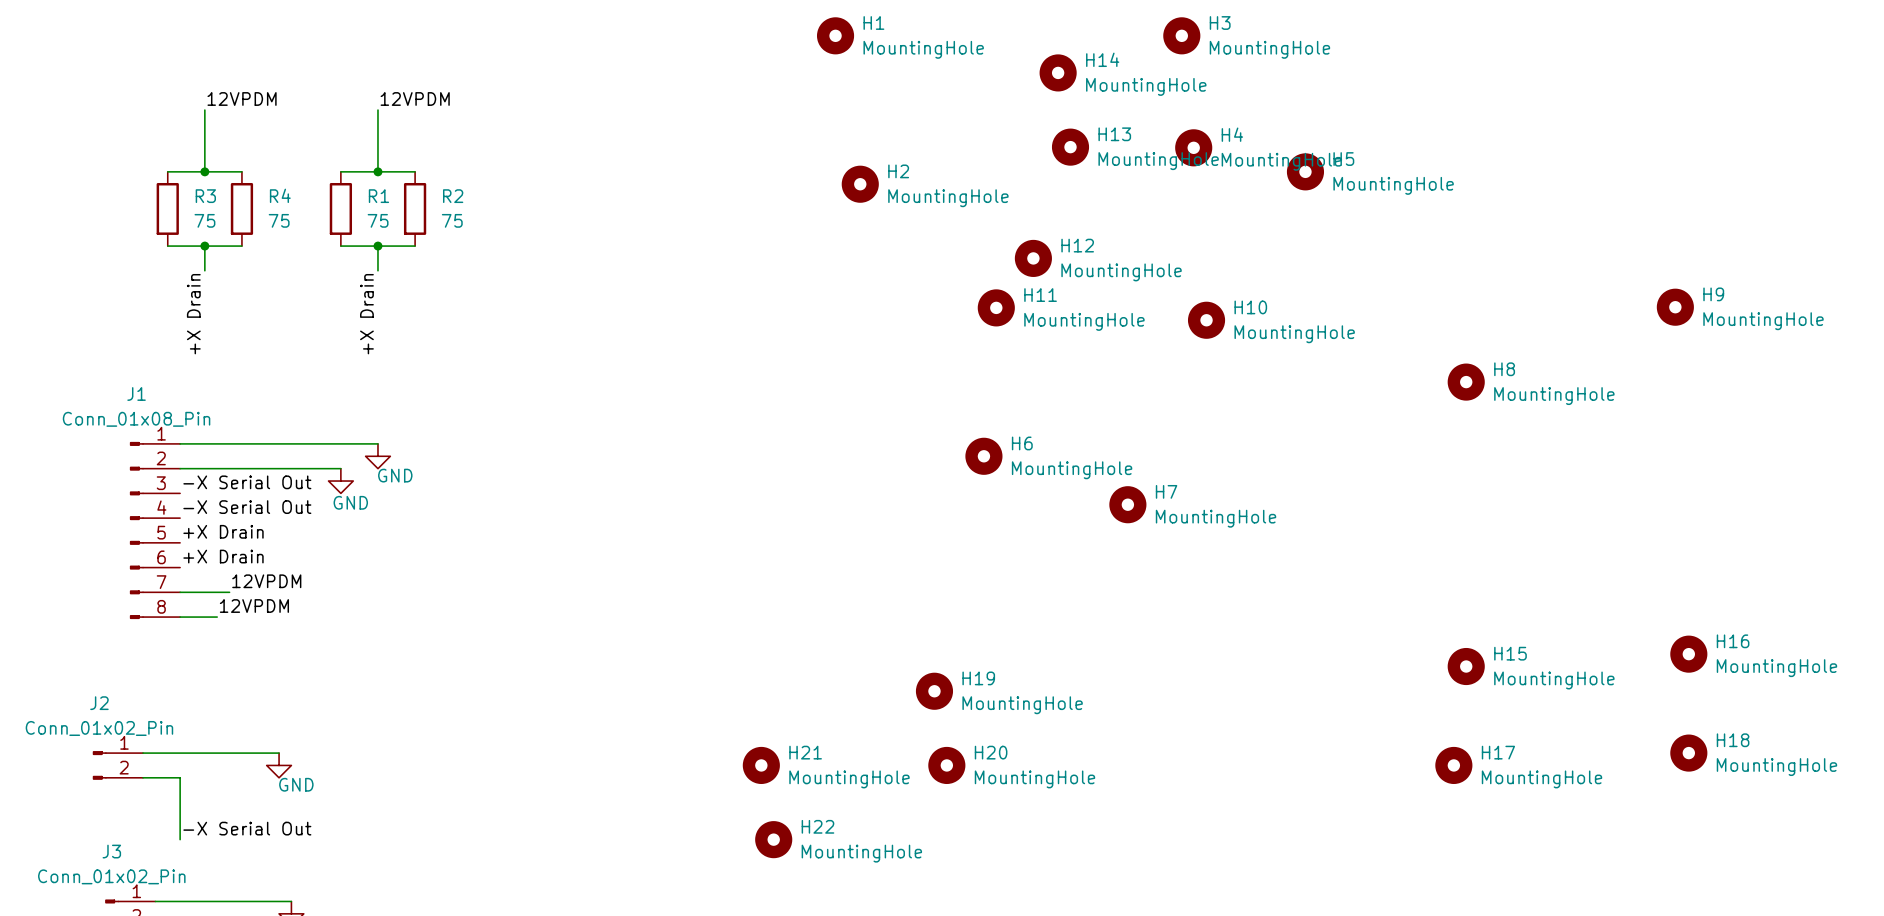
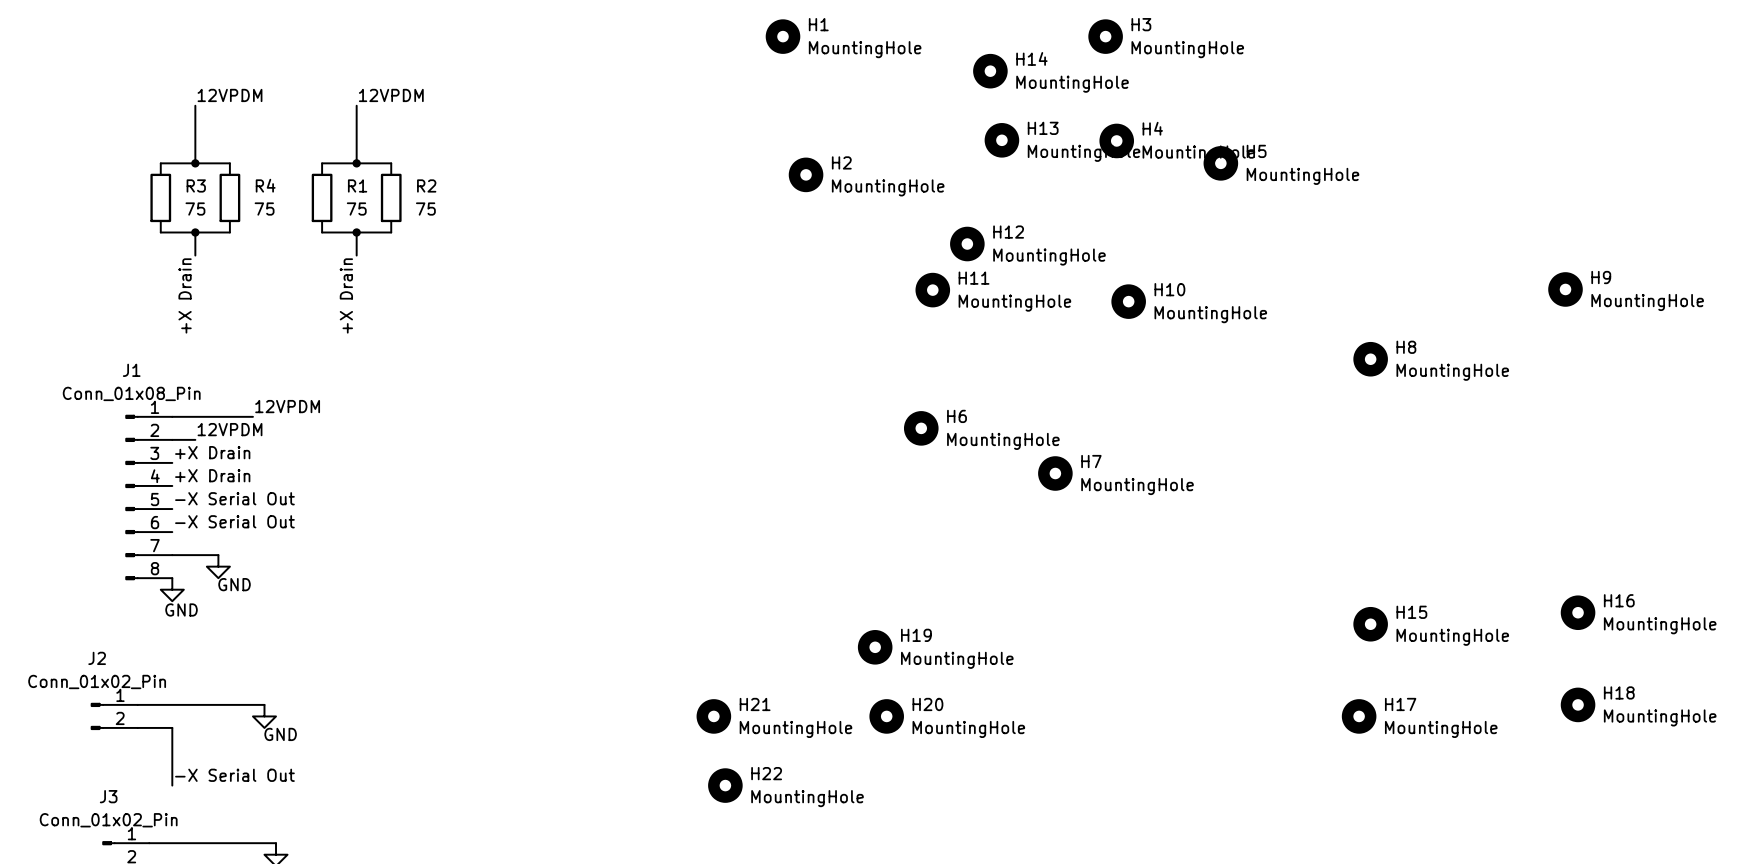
label: none -> 12VPDM (287, 406)
wire: (266, 443) (377, 443) -> none
power symbol: GND (377, 456) -> none
label: none -> 12VPDM (230, 429)
wire: (204, 468) (340, 468) -> none
power symbol: GND (340, 481) -> none
label: -X Serial Out (247, 482) -> +X Drain (212, 452)
label: -X Serial Out (247, 507) -> +X Drain (212, 475)
label: +X Drain (223, 531) -> -X Serial Out (234, 498)
label: +X Drain (223, 556) -> -X Serial Out (234, 521)
label: 12VPDM (266, 581) -> none
power symbol: none -> GND (218, 566)
label: 12VPDM (254, 606) -> none
wire: (180, 617) (217, 617) -> none
power symbol: none -> GND (172, 589)

